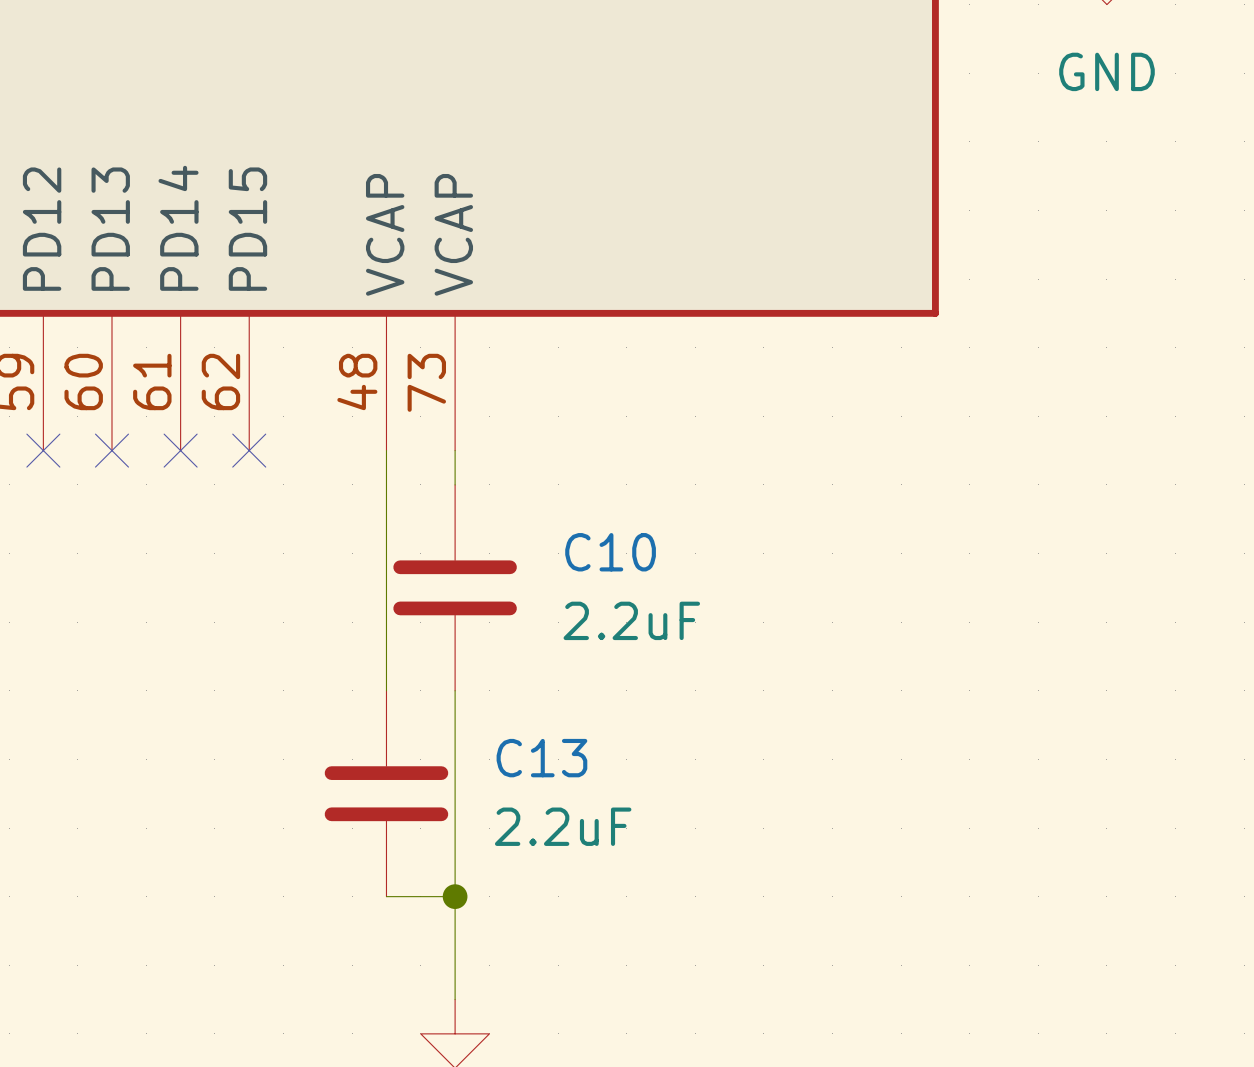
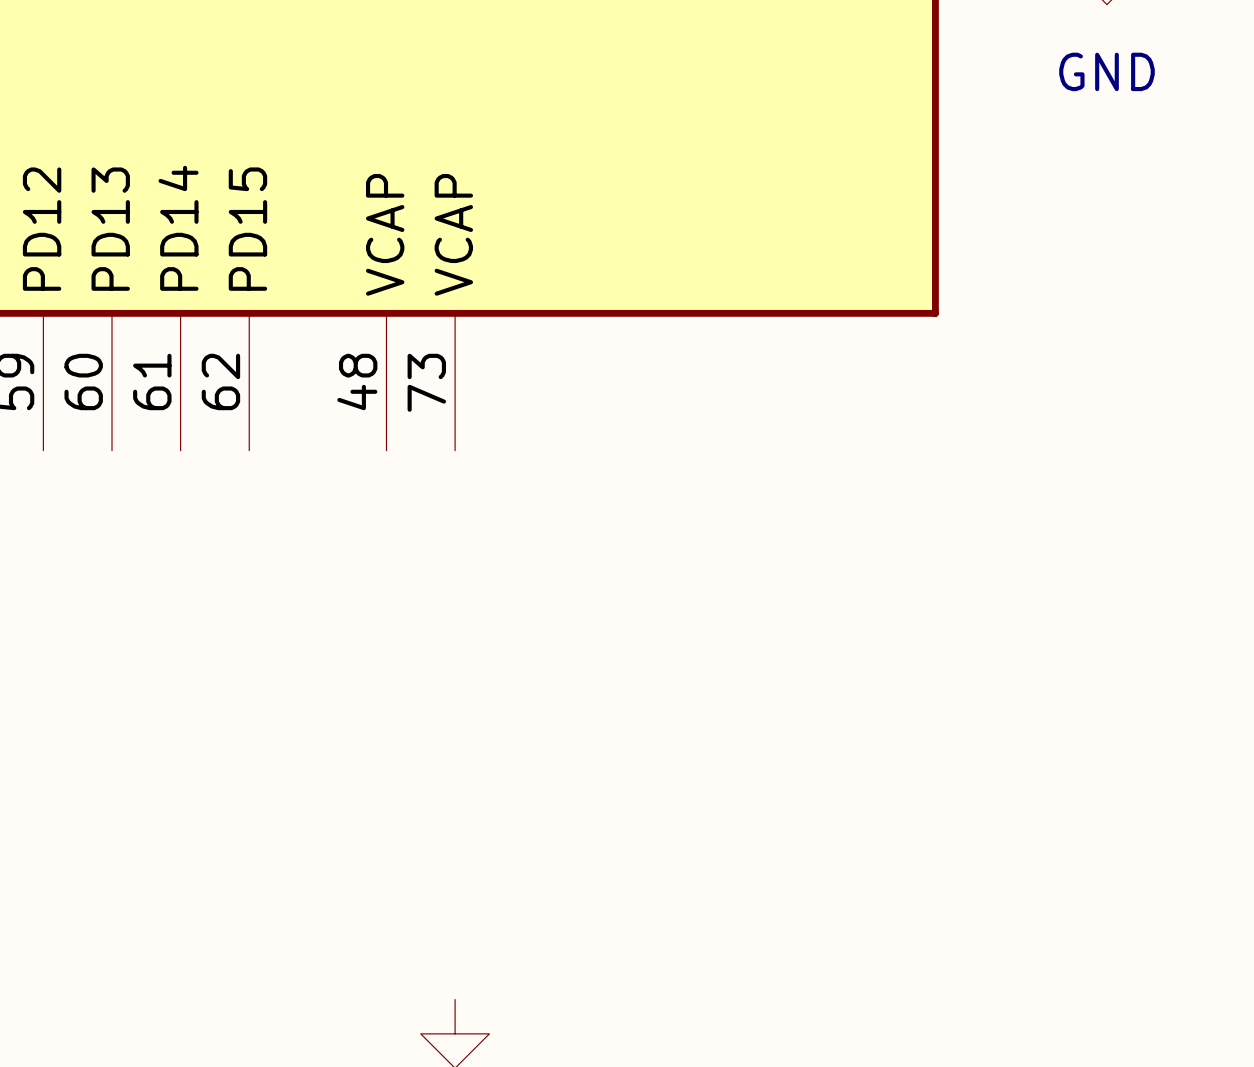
no-connect mark: (43, 450) -> none
no-connect mark: (111, 450) -> none
no-connect mark: (180, 450) -> none
no-connect mark: (249, 450) -> none
wire: (386, 450) (386, 690) -> none
wire: (455, 450) (455, 484) -> none
C10: 2.2uF (455, 587) -> none
wire: (455, 690) (455, 999) -> none
C13: 2.2uF (386, 793) -> none
wire: (386, 896) (455, 896) -> none
junction: (455, 896) -> none

